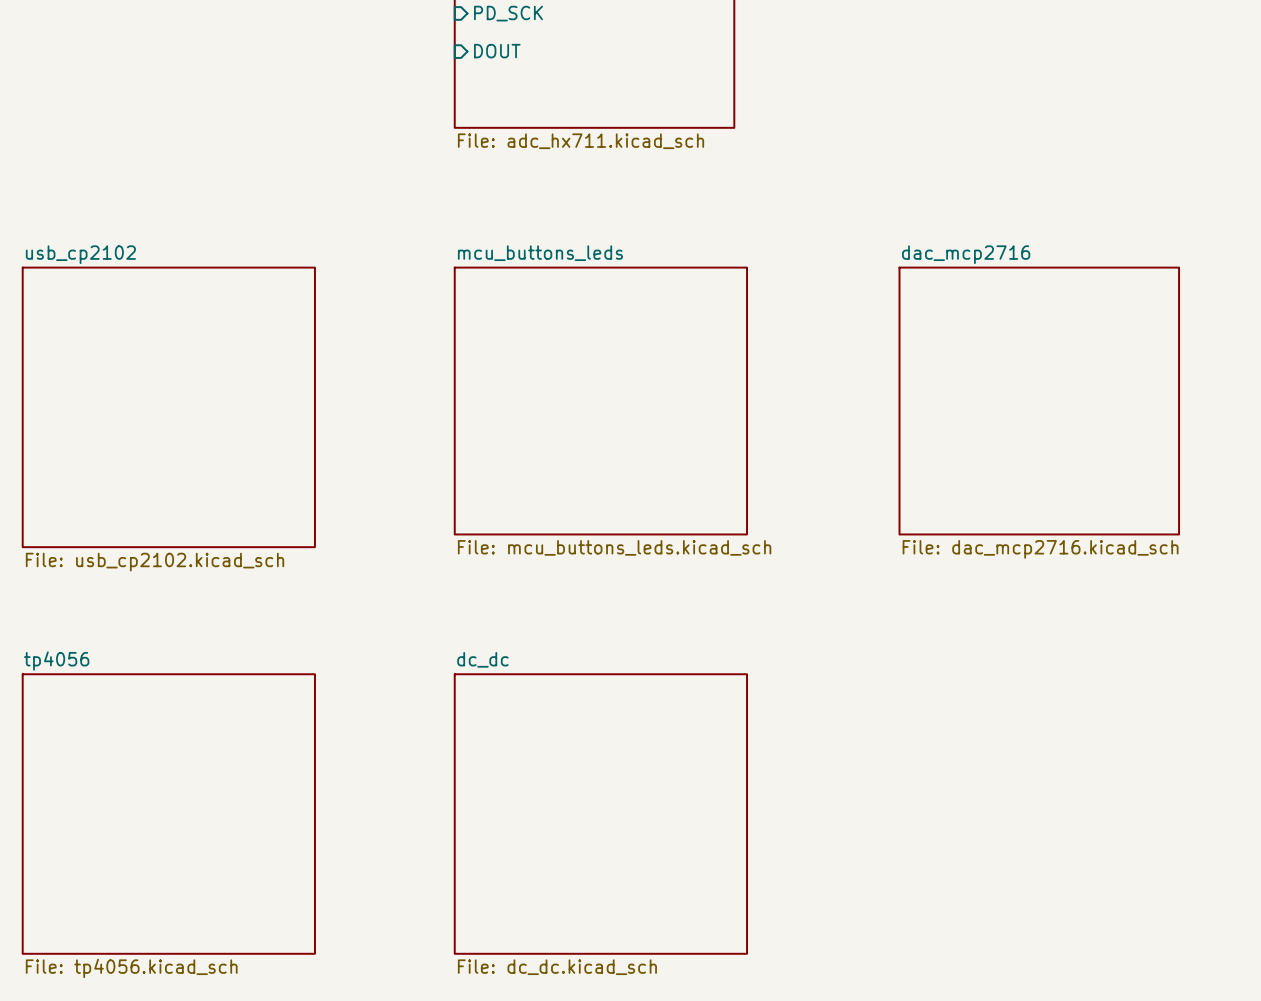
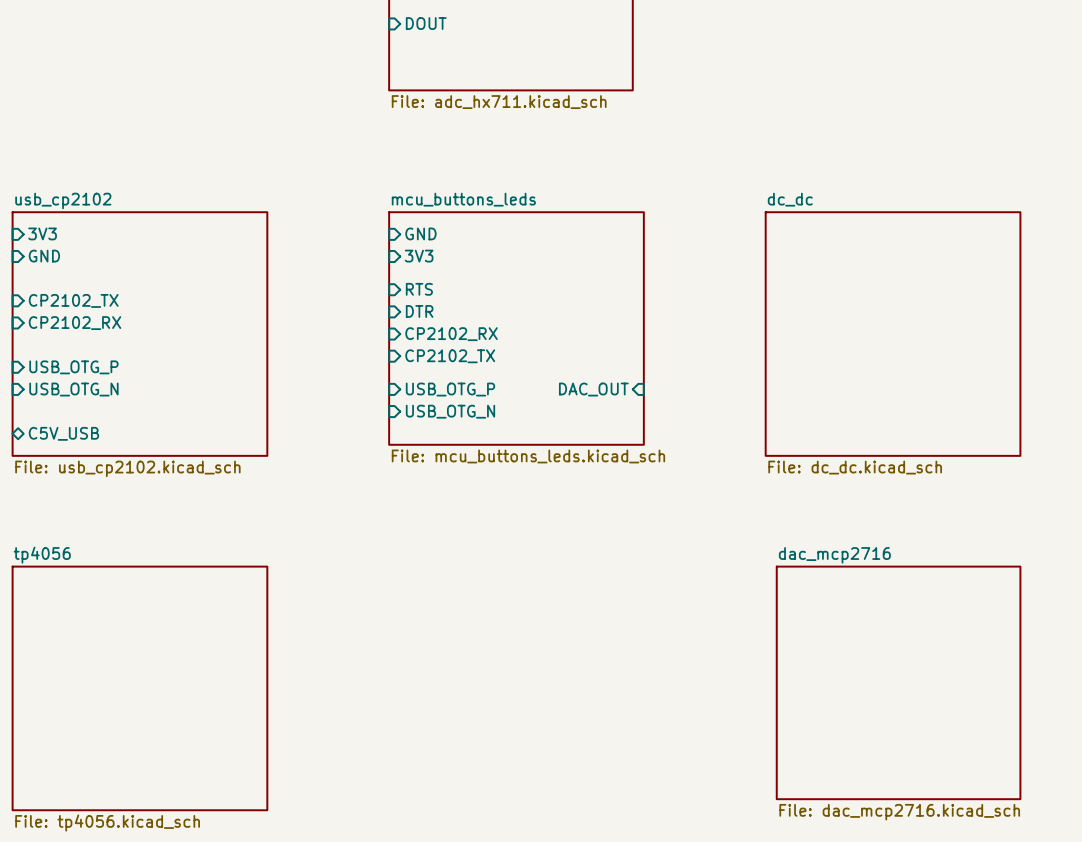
sheet pin: none -> 3V3 (42, 233)
sheet pin: none -> GND (420, 233)
sheet pin: none -> GND (44, 256)
sheet pin: none -> 3V3 (419, 256)
sheet pin: none -> RTS (419, 289)
sheet pin: none -> CP2102_TX (73, 300)
sheet pin: none -> DTR (419, 311)
sheet pin: none -> CP2102_RX (75, 323)
sheet dac_mcp2716 position: (1039, 401) -> (898, 682)
sheet pin: none -> CP2102_RX (451, 334)
sheet dc_dc: none -> File: dc_dc.kicad_sch (893, 334)
sheet pin: none -> CP2102_TX (450, 356)
sheet pin: none -> USB_OTG_P (73, 367)
sheet pin: none -> USB_OTG_N (73, 389)
sheet pin: none -> USB_OTG_P (450, 389)
sheet pin: none -> DAC_OUT (593, 389)
sheet pin: none -> USB_OTG_N (450, 411)
sheet pin: none -> C5V_USB (63, 433)
sheet dc_dc: File: dc_dc.kicad_sch (600, 814) -> none

